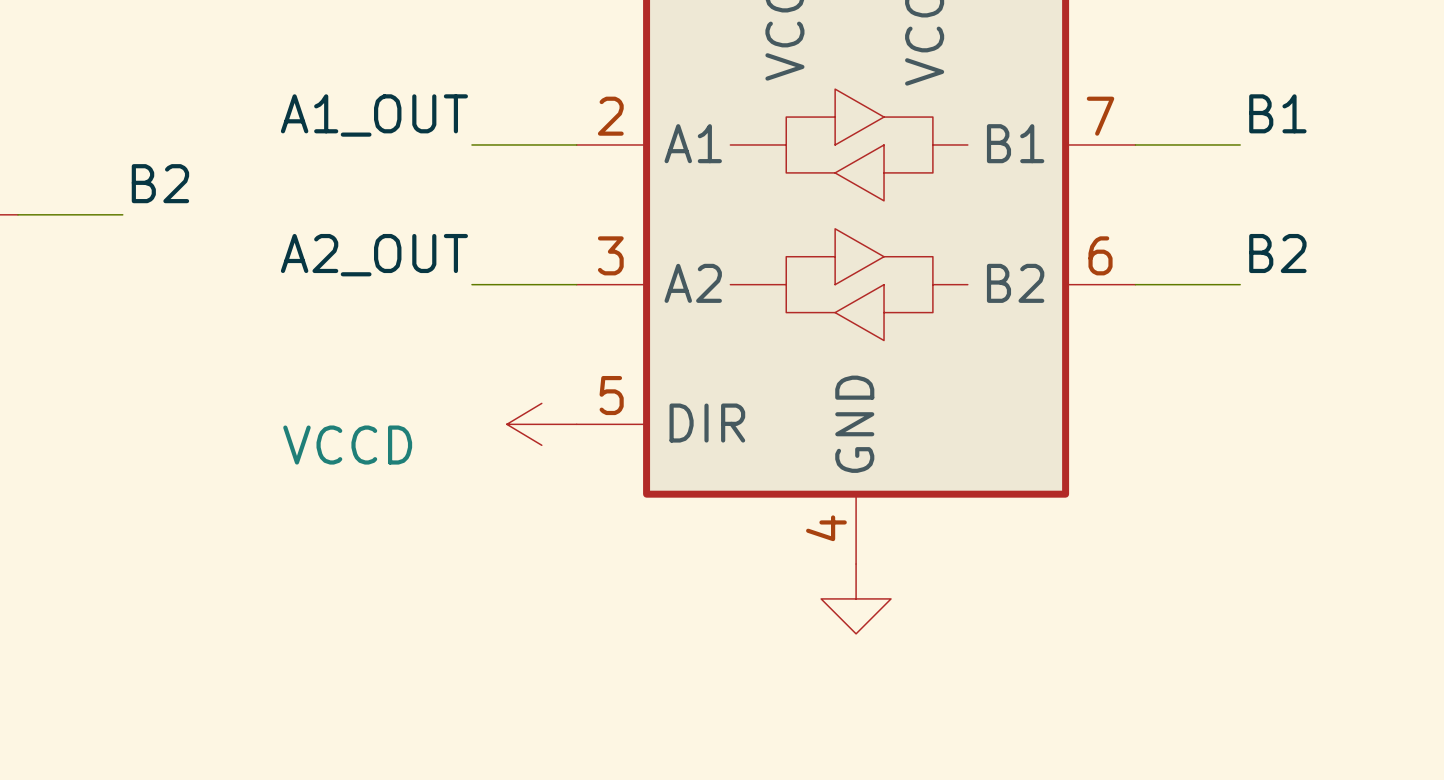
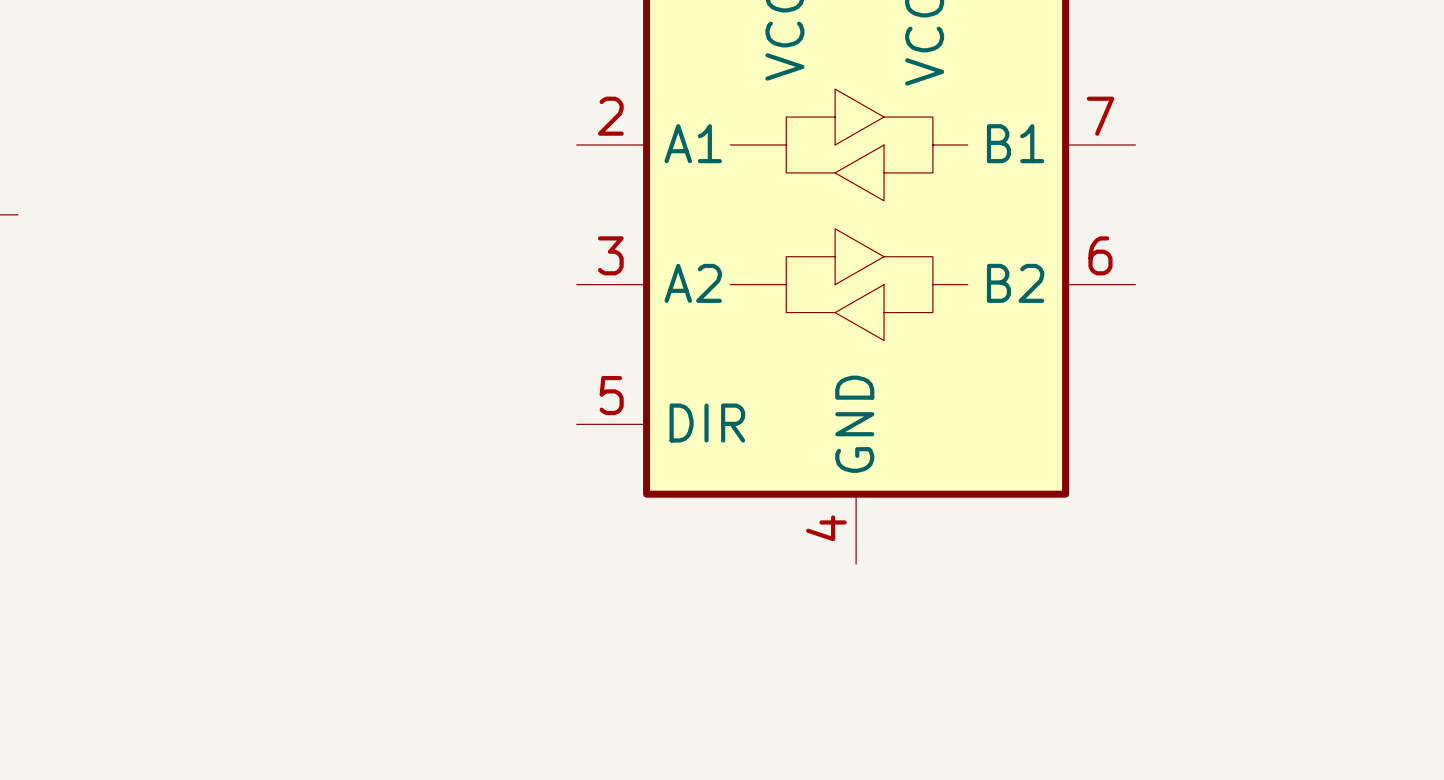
label: B1 (1277, 113) -> none
label: A1_OUT (374, 115) -> none
wire: (471, 144) (576, 144) -> none
wire: (1135, 144) (1240, 144) -> none
label: B2 (160, 183) -> none
wire: (18, 214) (122, 214) -> none
label: B2 (1277, 253) -> none
label: A2_OUT (374, 255) -> none
wire: (471, 284) (576, 284) -> none
wire: (1135, 284) (1240, 284) -> none
power symbol: VCCD (541, 424) -> none
power symbol: (856, 598) -> none

